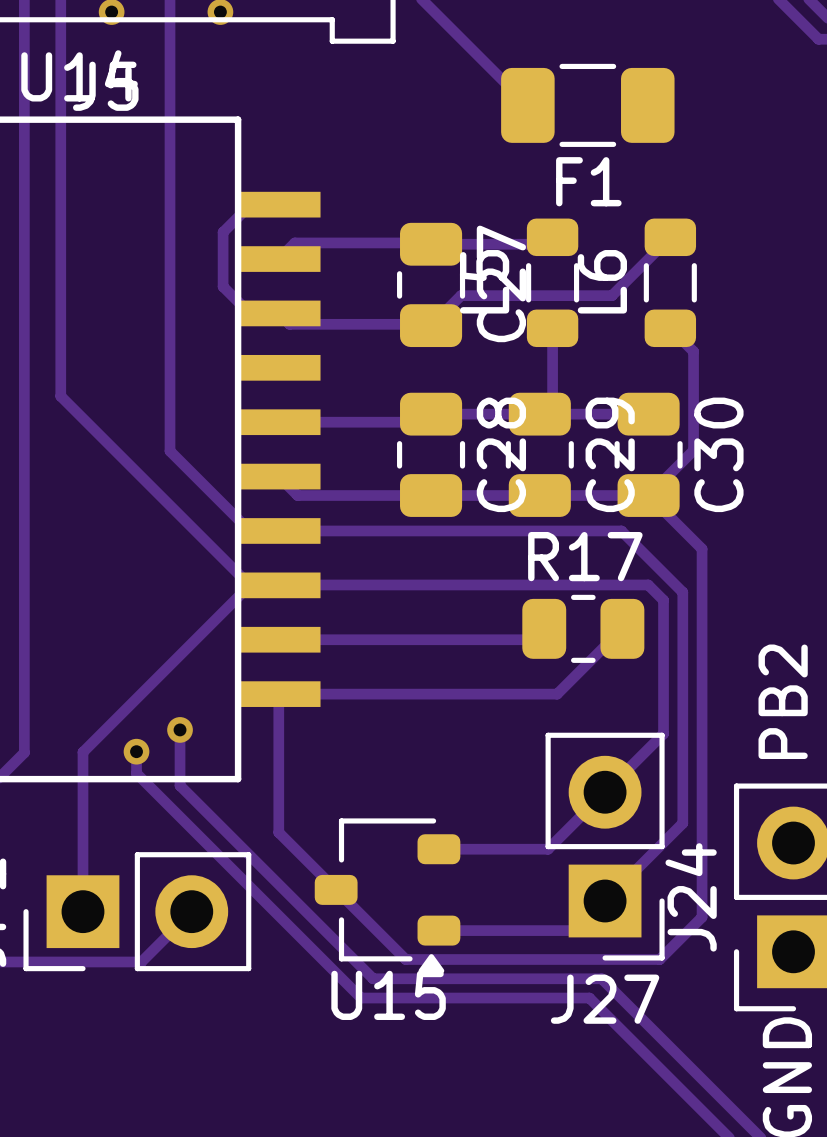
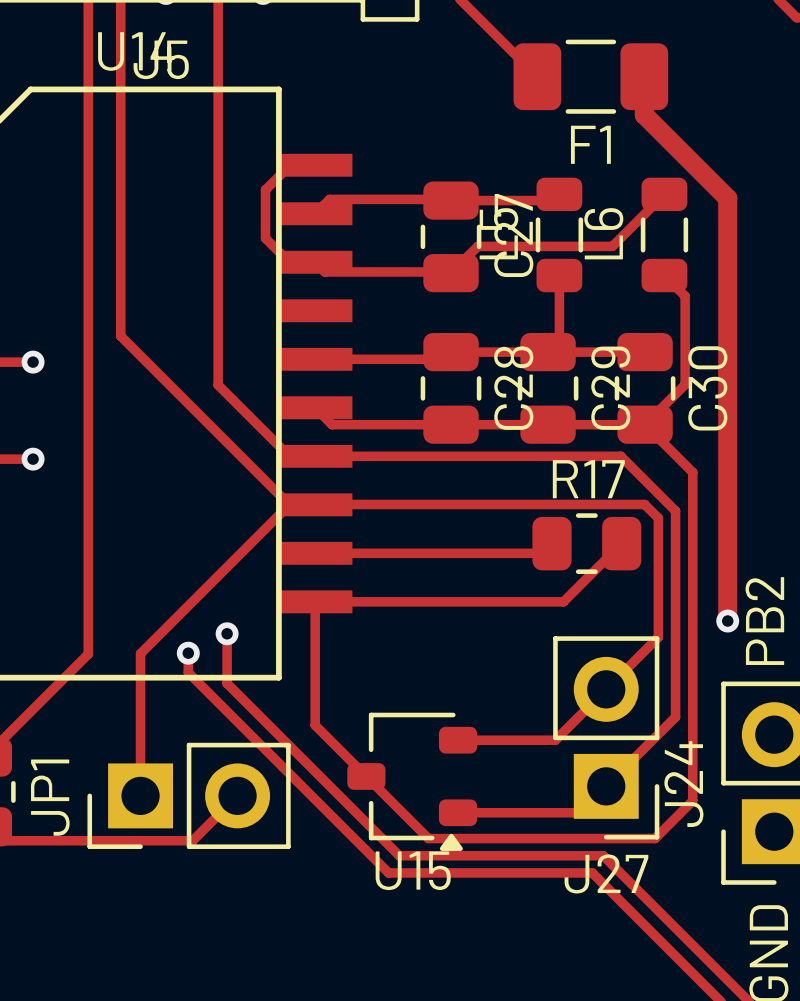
track: none -> (644, 76) (644, 114) (727, 198) (727, 621)
via: none -> (727, 621)

